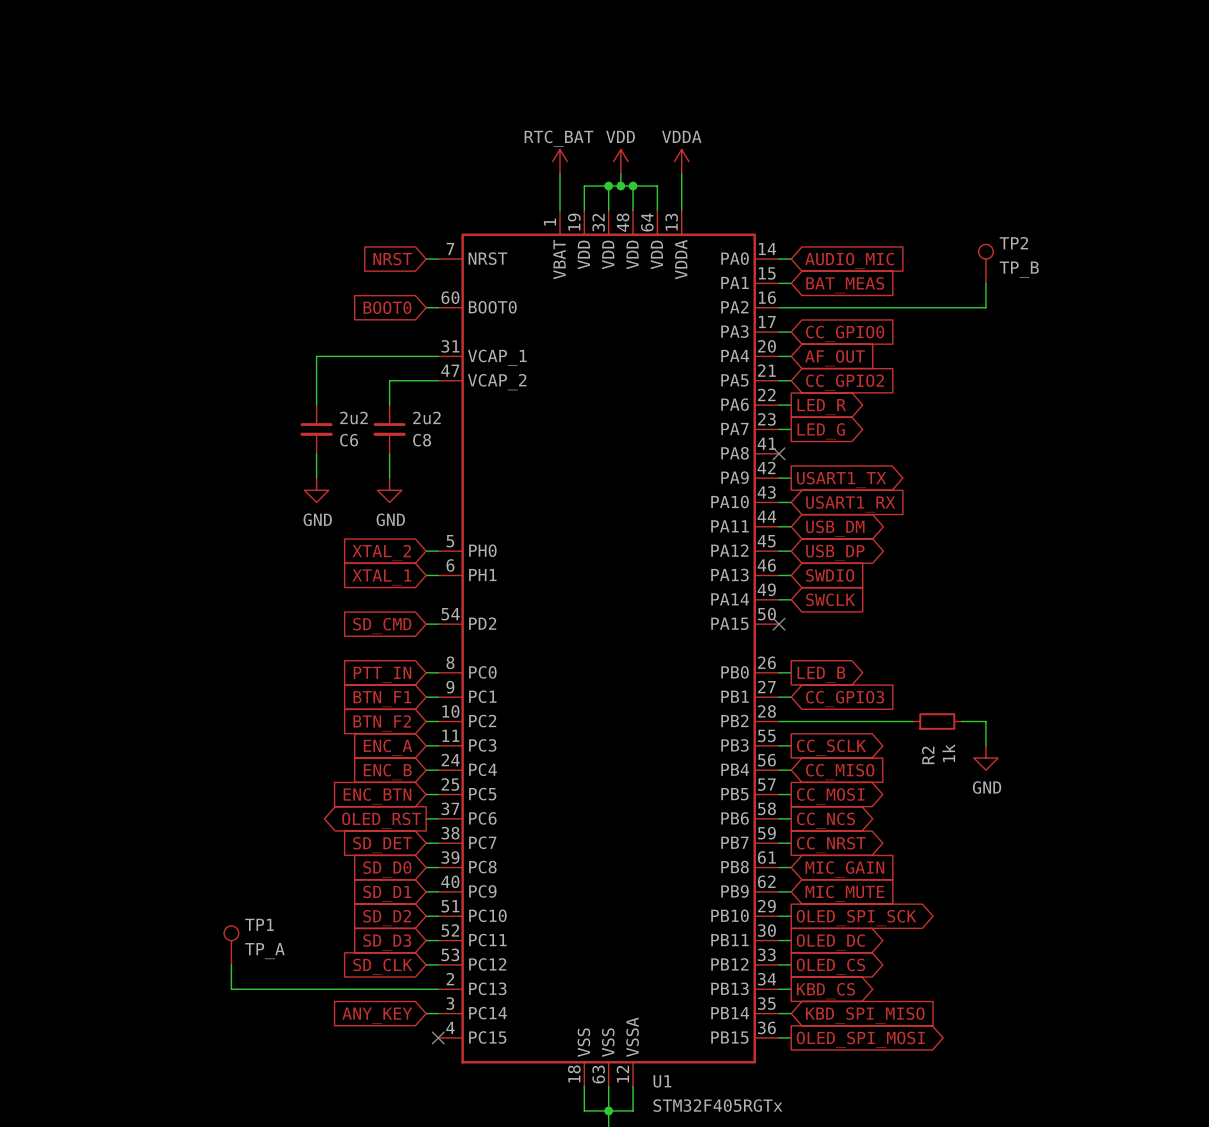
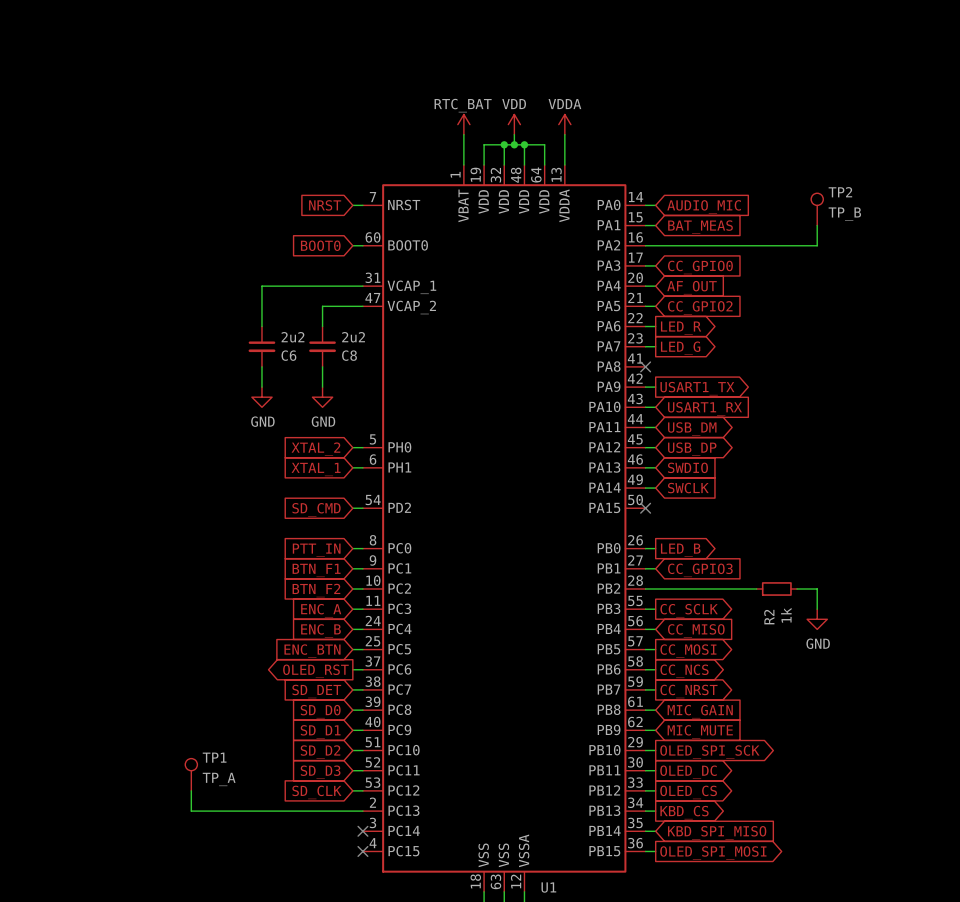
wire: (426, 1013) (438, 1013) -> none
no-connect mark: none -> (362, 831)
global label: ANY_KEY (377, 1015) -> none

